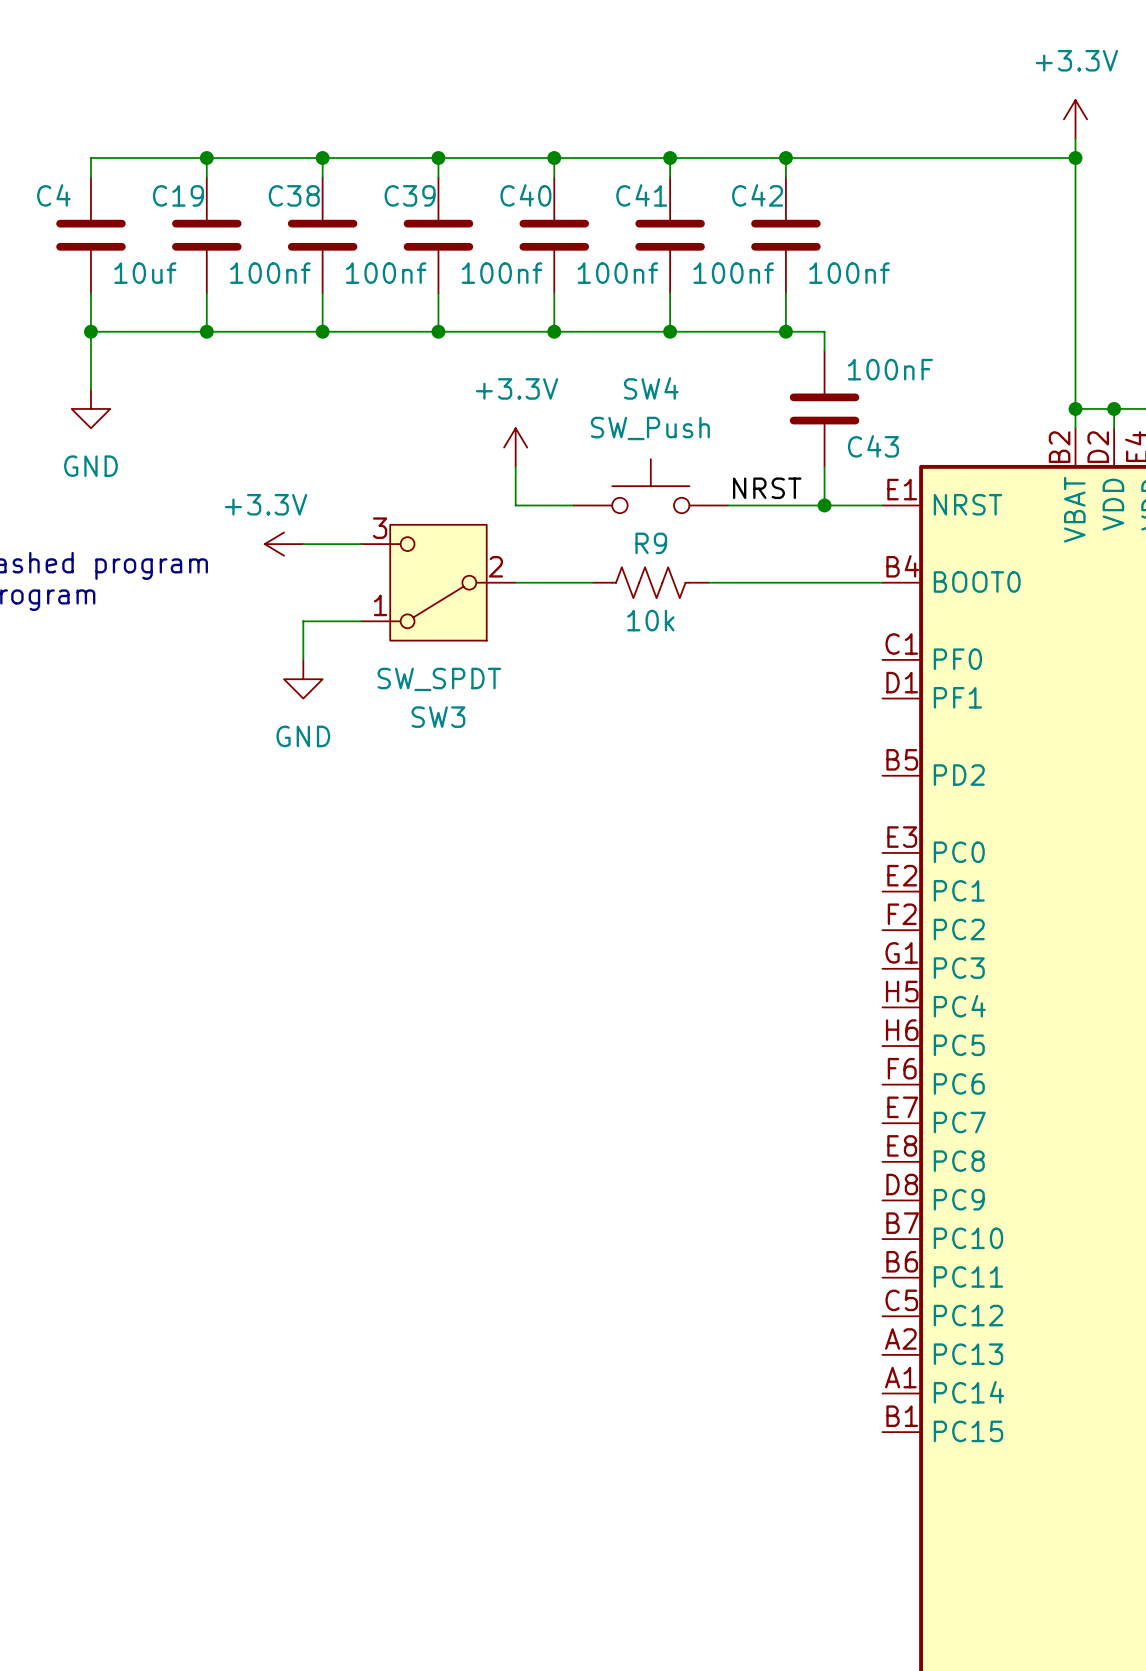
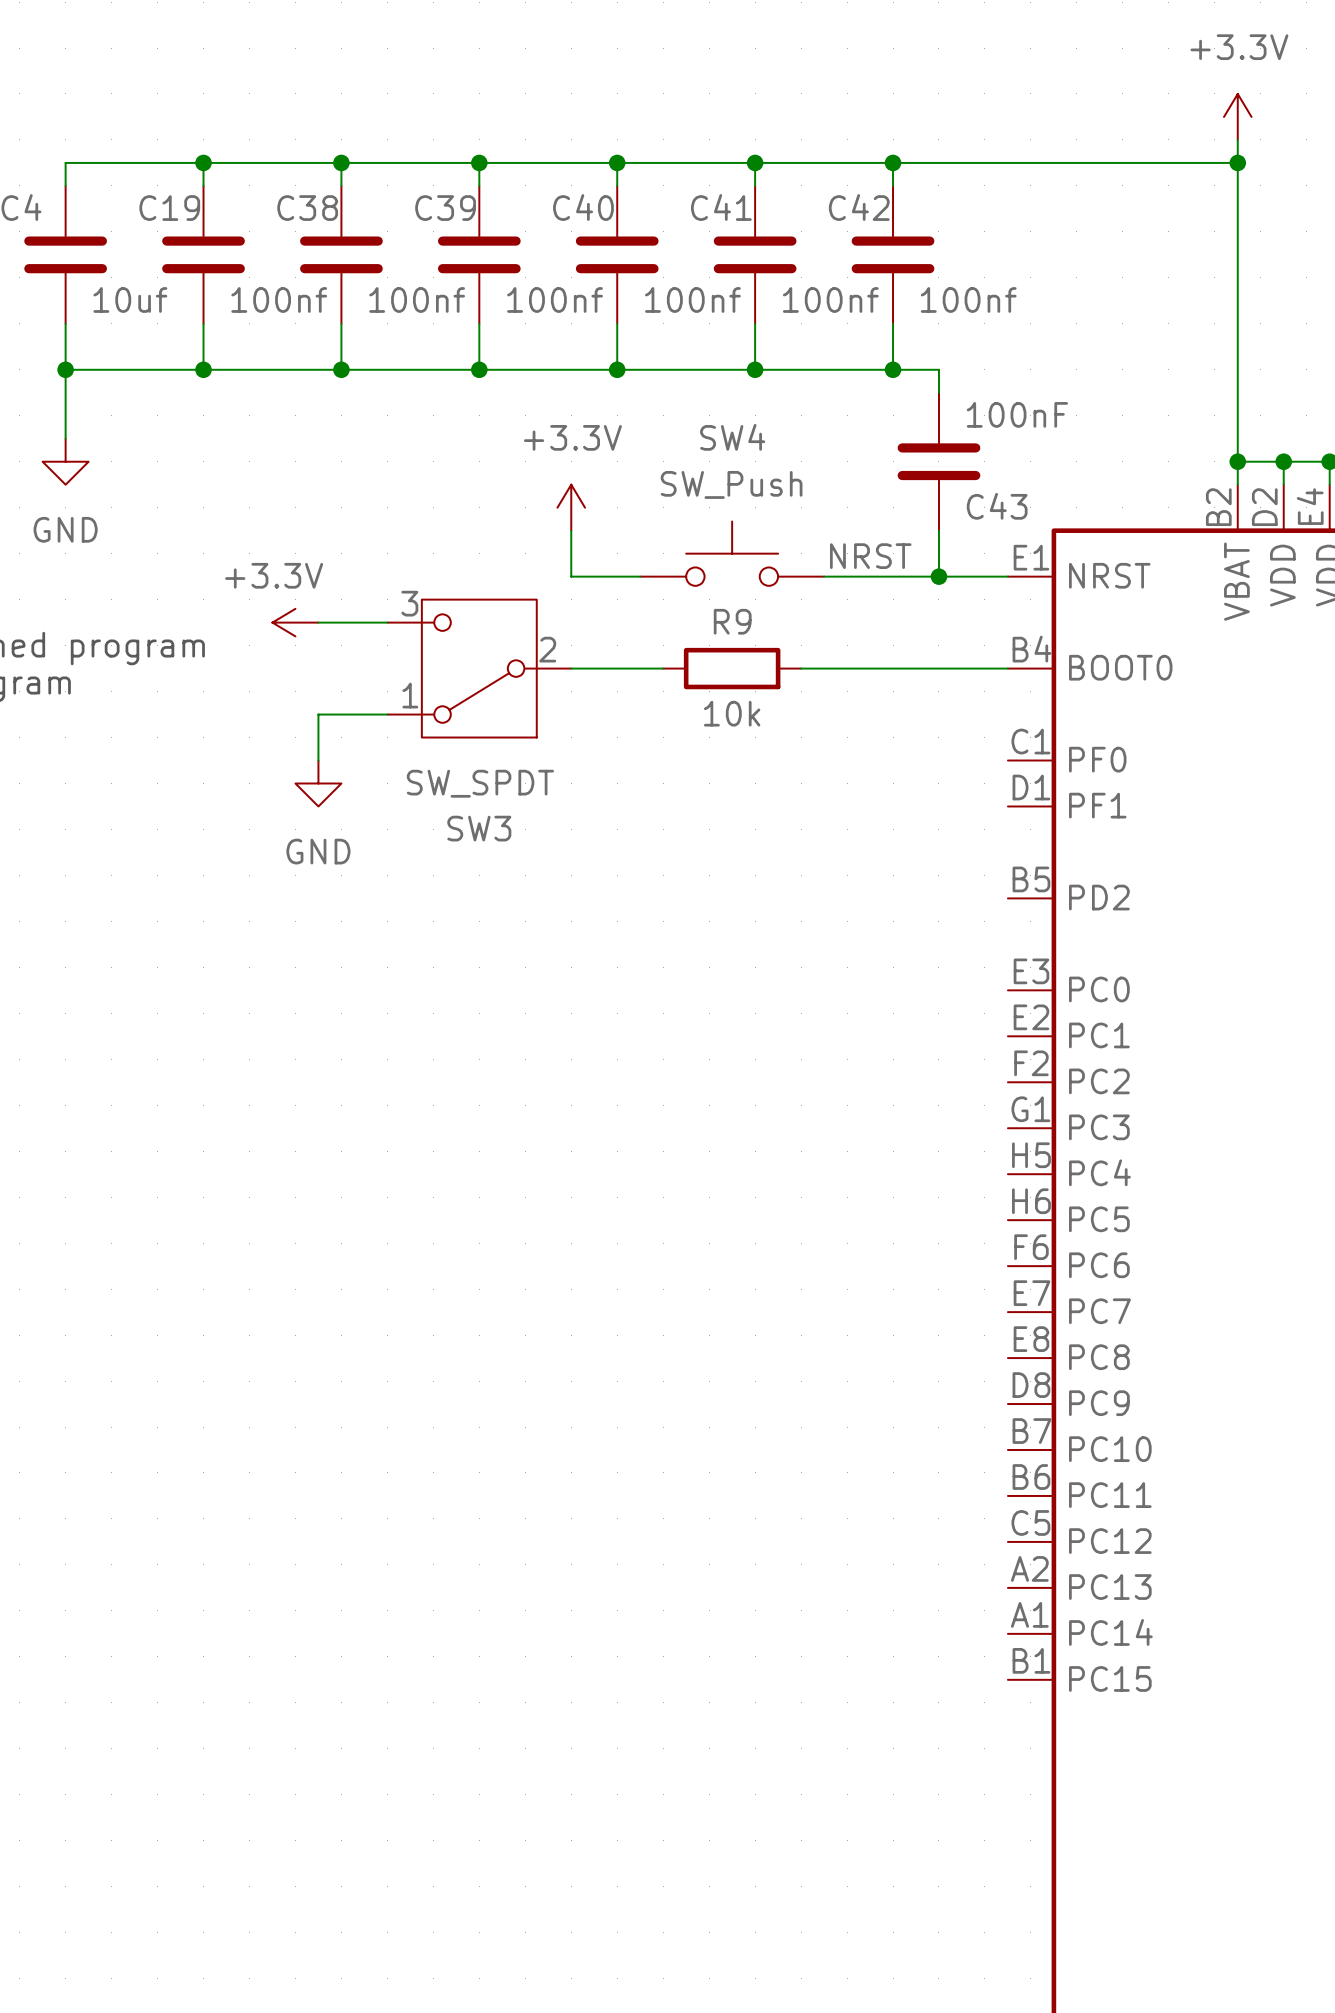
R9 symbol: [592, 567, 709, 599] -> [663, 647, 802, 690]

